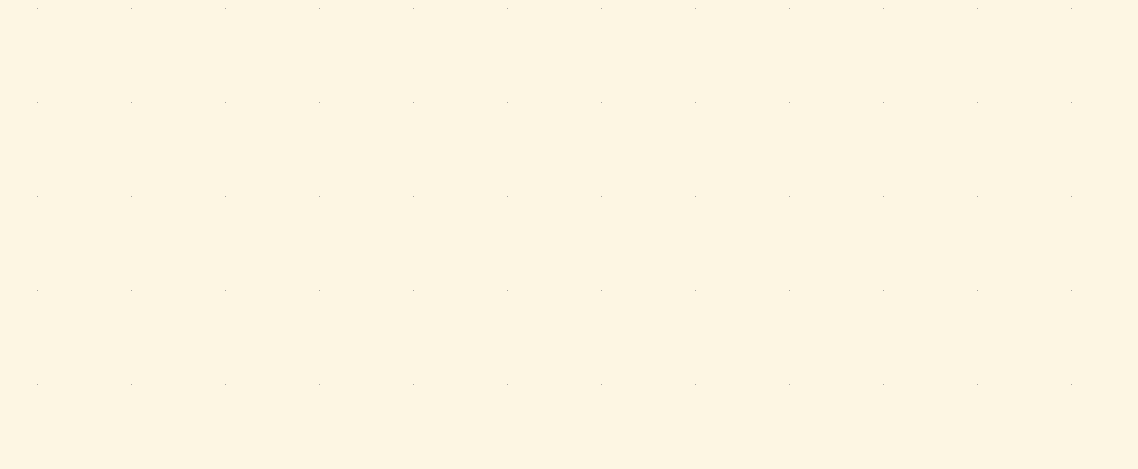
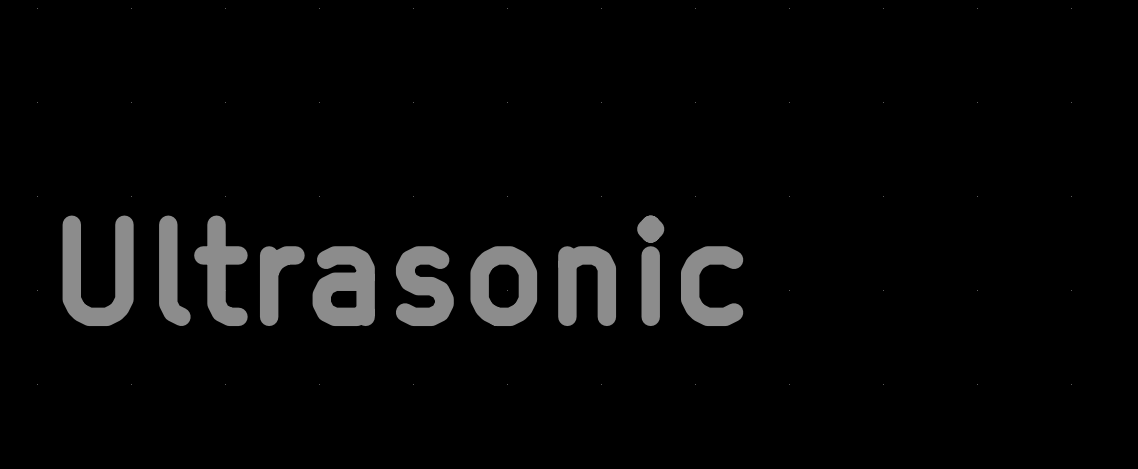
text: none -> Ultrasonic (402, 270)

